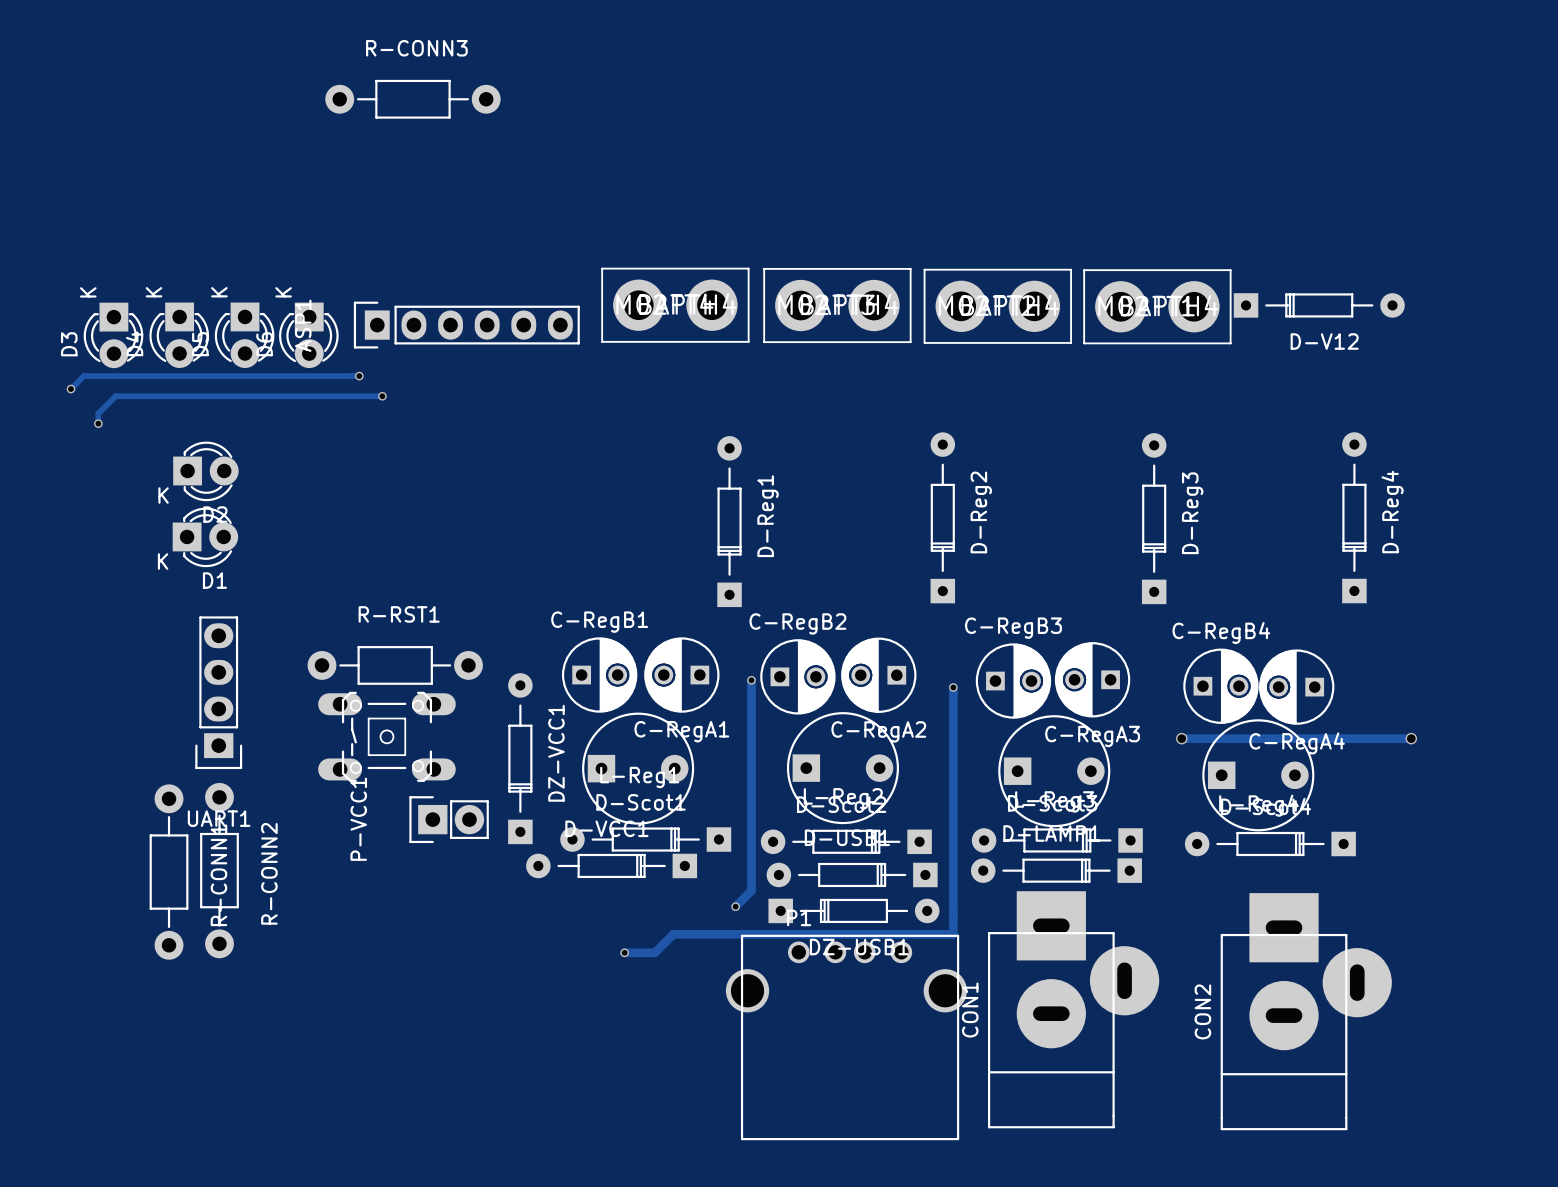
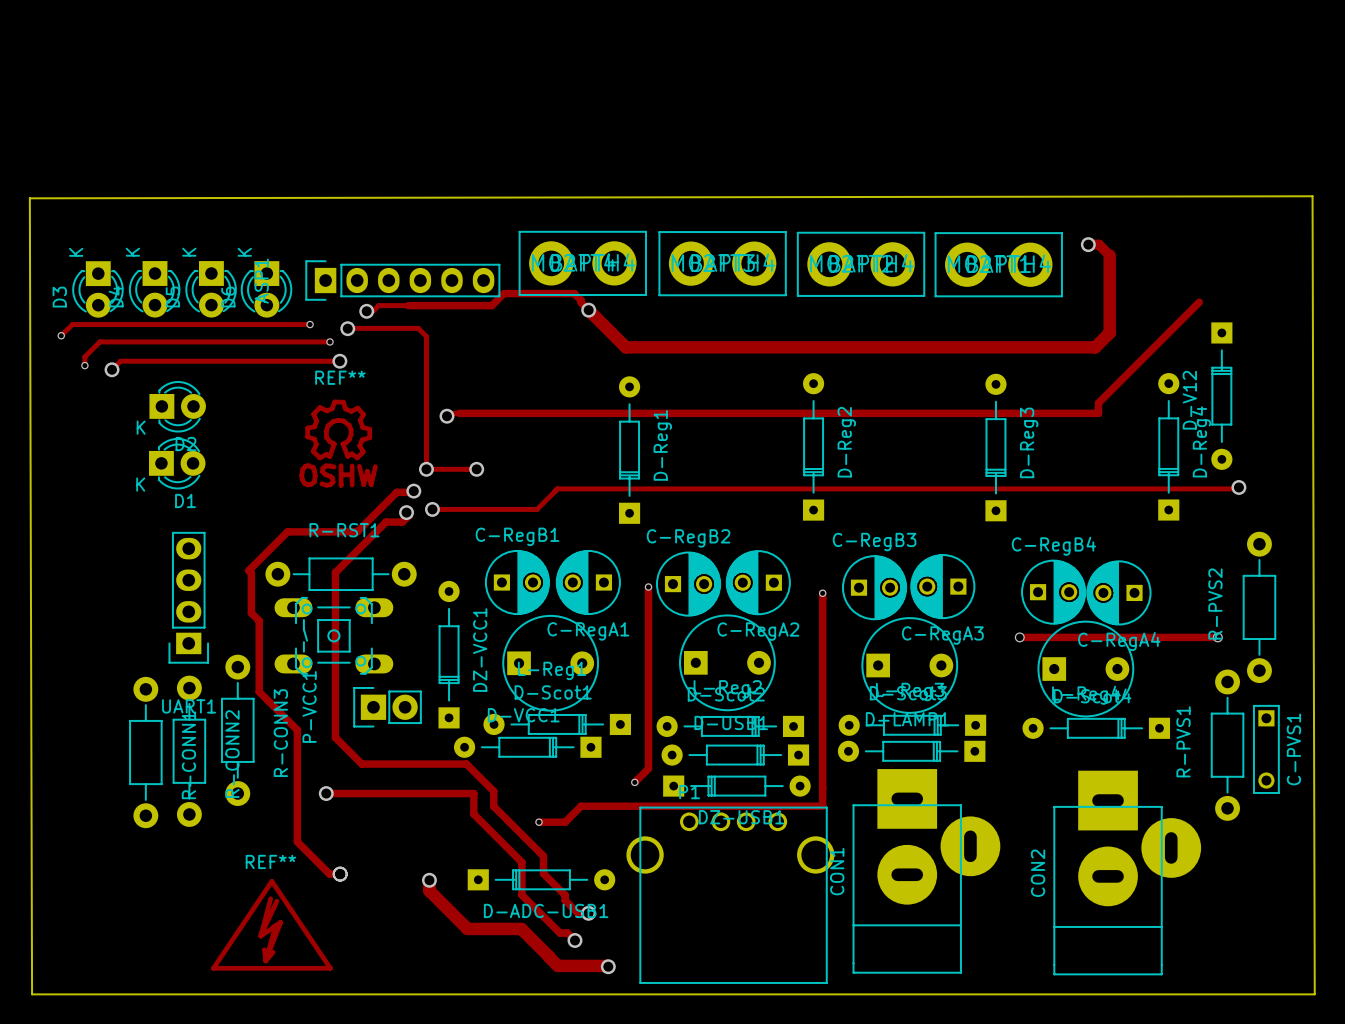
R-CONN3 rotation: 0° (412, 99) -> 90° clockwise (237, 730)
R-CONN3 position: (412, 99) -> (237, 730)
board edge: none -> (1312, 196) (1314, 994) (32, 994) (29, 198) (1312, 196)
track: none -> (1088, 244) (1098, 244) (1109, 255) (1109, 332) (1095, 347) (625, 347) (574, 293) (503, 293) (491, 305) (378, 305) (373, 311) (366, 311)
via: none -> (1088, 244)
D-V12 rotation: 0° (1319, 305) -> 90° clockwise (1221, 396)
D-V12 position: (1319, 305) -> (1221, 396)
track: none -> (1199, 302) (1098, 403) (1098, 413) (450, 413) (446, 416)
via: none -> (588, 310)
via: none -> (366, 311)
track: none -> (347, 328) (418, 328) (426, 336) (426, 469) (476, 469)
via: none -> (347, 328)
track: none -> (339, 361) (120, 361) (112, 369)
via: none -> (339, 361)
via: none -> (112, 369)
via: none -> (446, 416)
REF**: none -> (338, 443)
via: none -> (426, 469)
via: none -> (476, 469)
track: none -> (1238, 487) (557, 488) (537, 509) (432, 509)
via: none -> (1238, 487)
track: none -> (413, 491) (396, 492) (357, 531) (287, 531) (248, 570) (251, 573) (251, 613) (259, 620) (259, 691) (297, 730) (297, 841) (329, 874) (340, 874)
via: none -> (413, 491)
via: none -> (432, 509)
track: none -> (406, 512) (409, 515) (402, 522) (386, 522) (335, 572) (335, 737) (361, 764) (466, 764) (493, 791) (493, 806) (543, 856) (543, 873) (565, 895) (565, 900) (578, 913) (588, 913)
via: none -> (406, 512)
R-PVS2: none -> (1259, 607)
R-PVS1: none -> (1227, 745)
C-PVS1: none -> (1266, 749)
track: none -> (326, 793) (473, 793) (473, 814) (521, 862) (521, 894) (559, 933) (567, 933) (574, 940)
via: none -> (326, 793)
via: none -> (340, 874)
D-ADC-USB1: none -> (541, 879)
track: none -> (429, 880) (429, 890) (467, 928) (521, 928) (557, 965) (608, 966)
via: none -> (429, 880)
via: none -> (588, 913)
REF**: none -> (271, 924)
via: none -> (574, 940)
via: none -> (608, 966)

